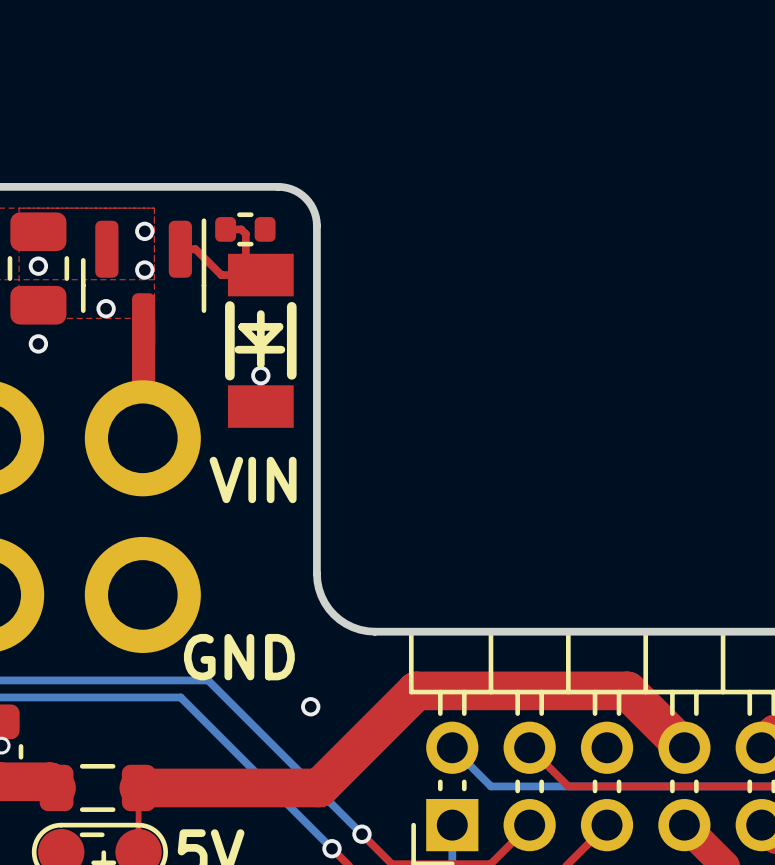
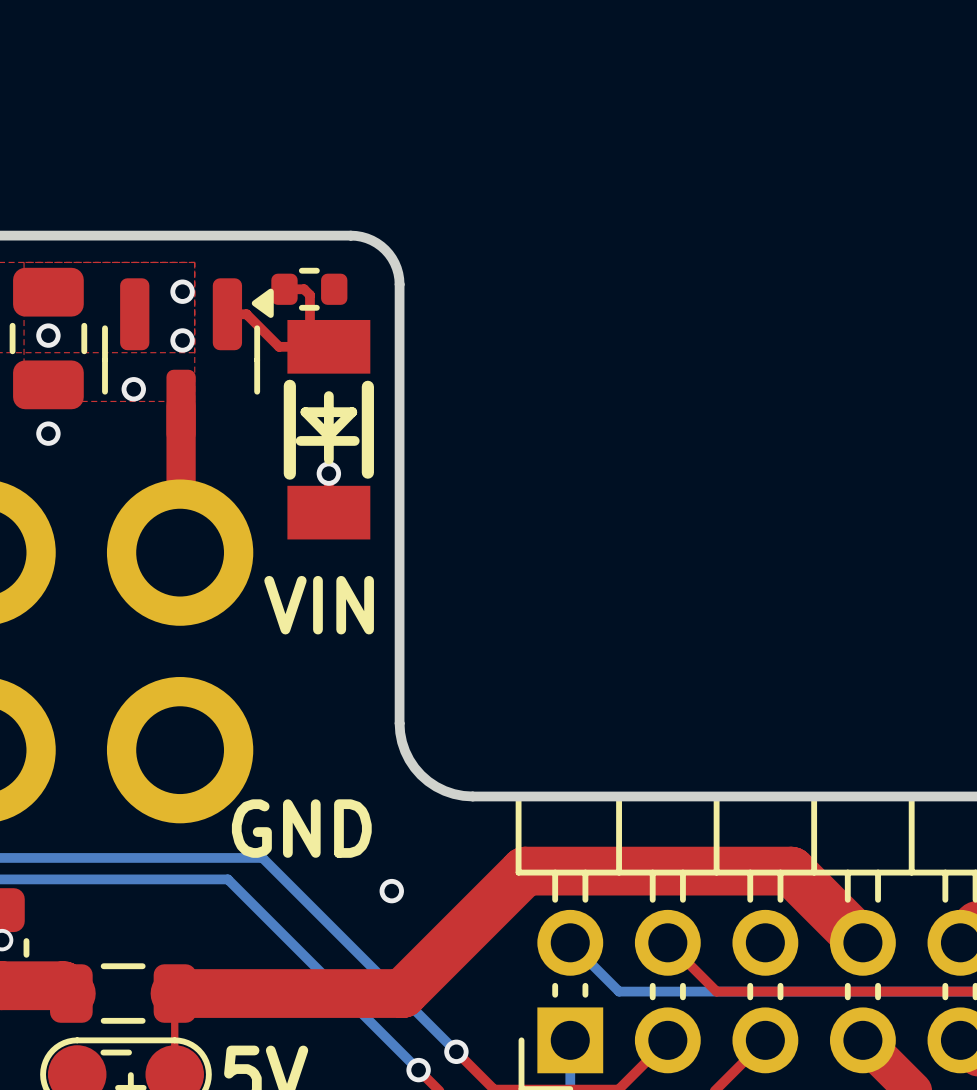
part footprint: [80, 218, 207, 351] -> [102, 278, 274, 442]

